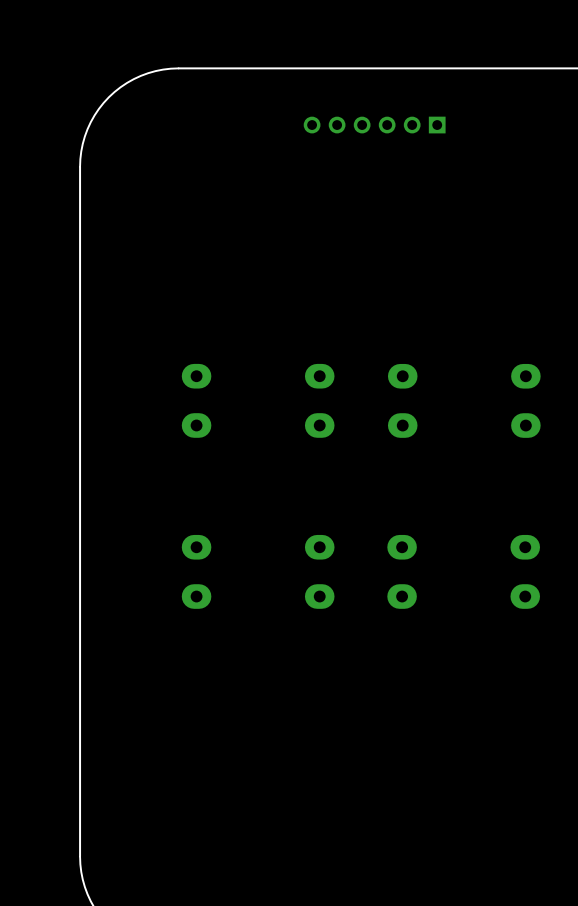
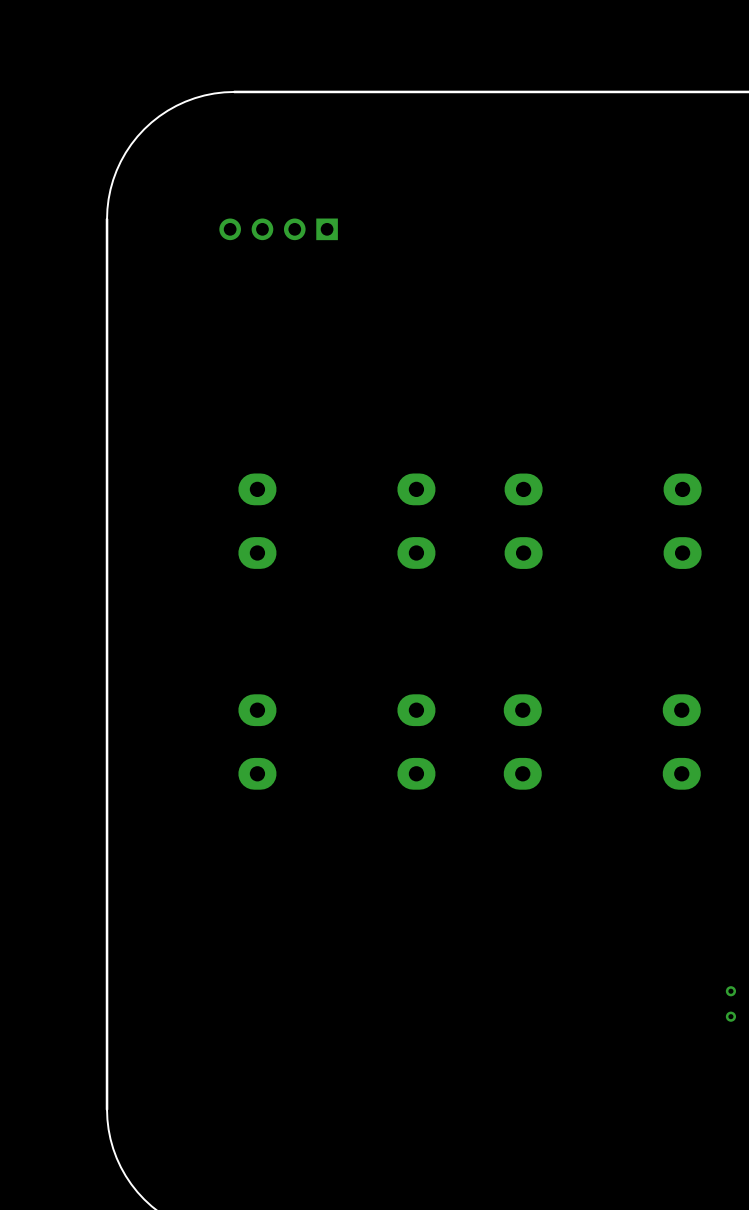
part: (374, 125) -> none
part: none -> (278, 229)
via: none -> (730, 991)
via: none -> (730, 1016)

